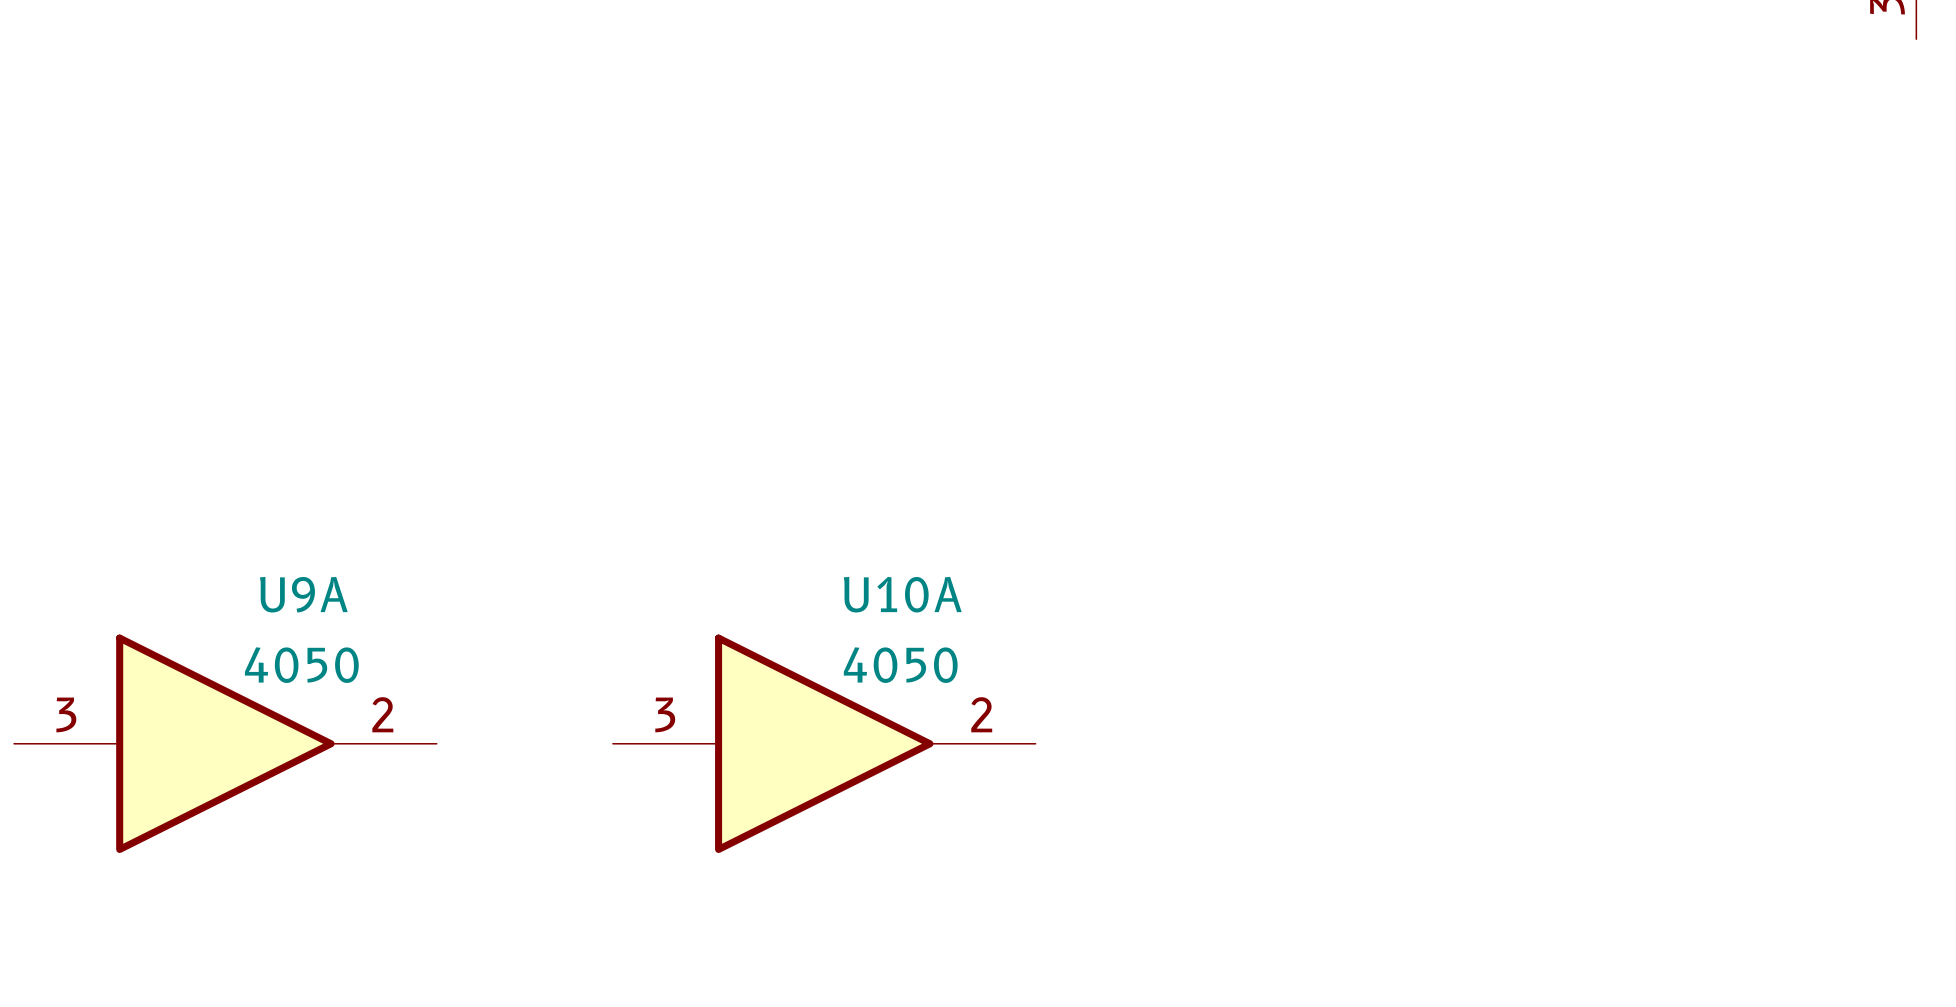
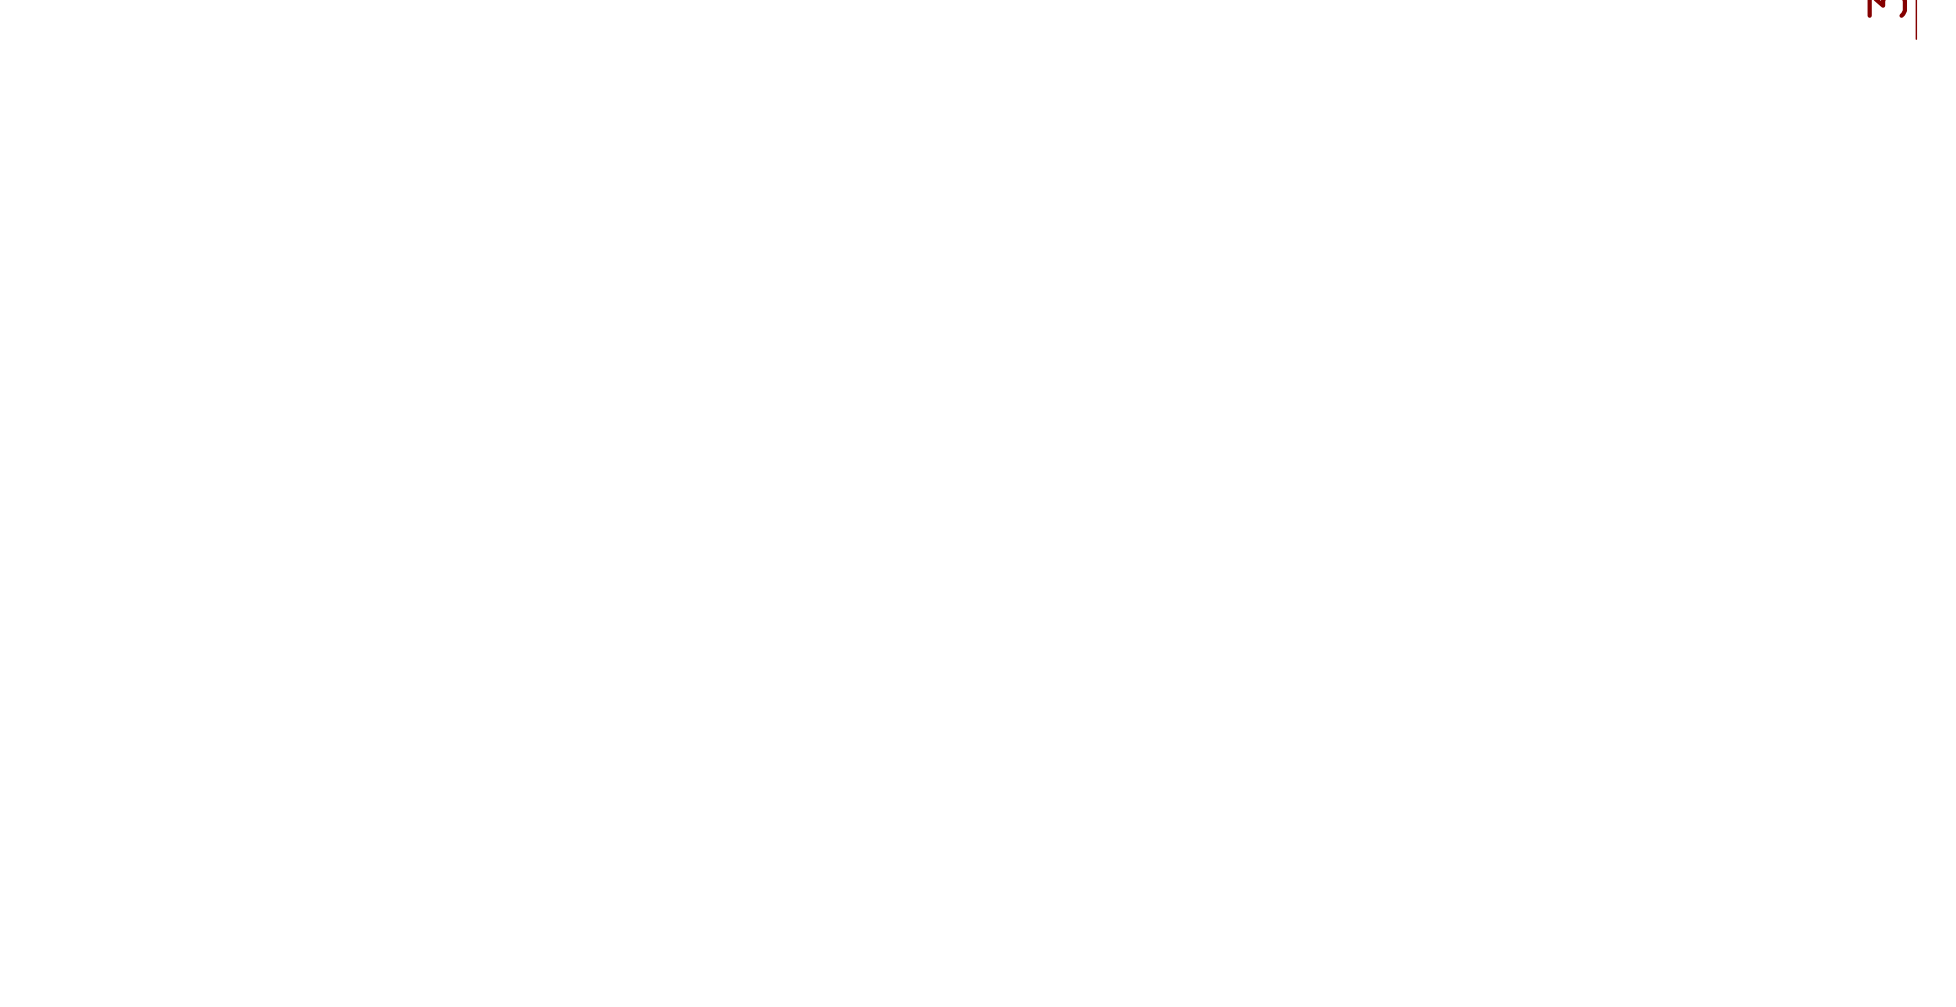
U9A: 4050 (225, 743) -> none
U10A: 4050 (824, 743) -> none

